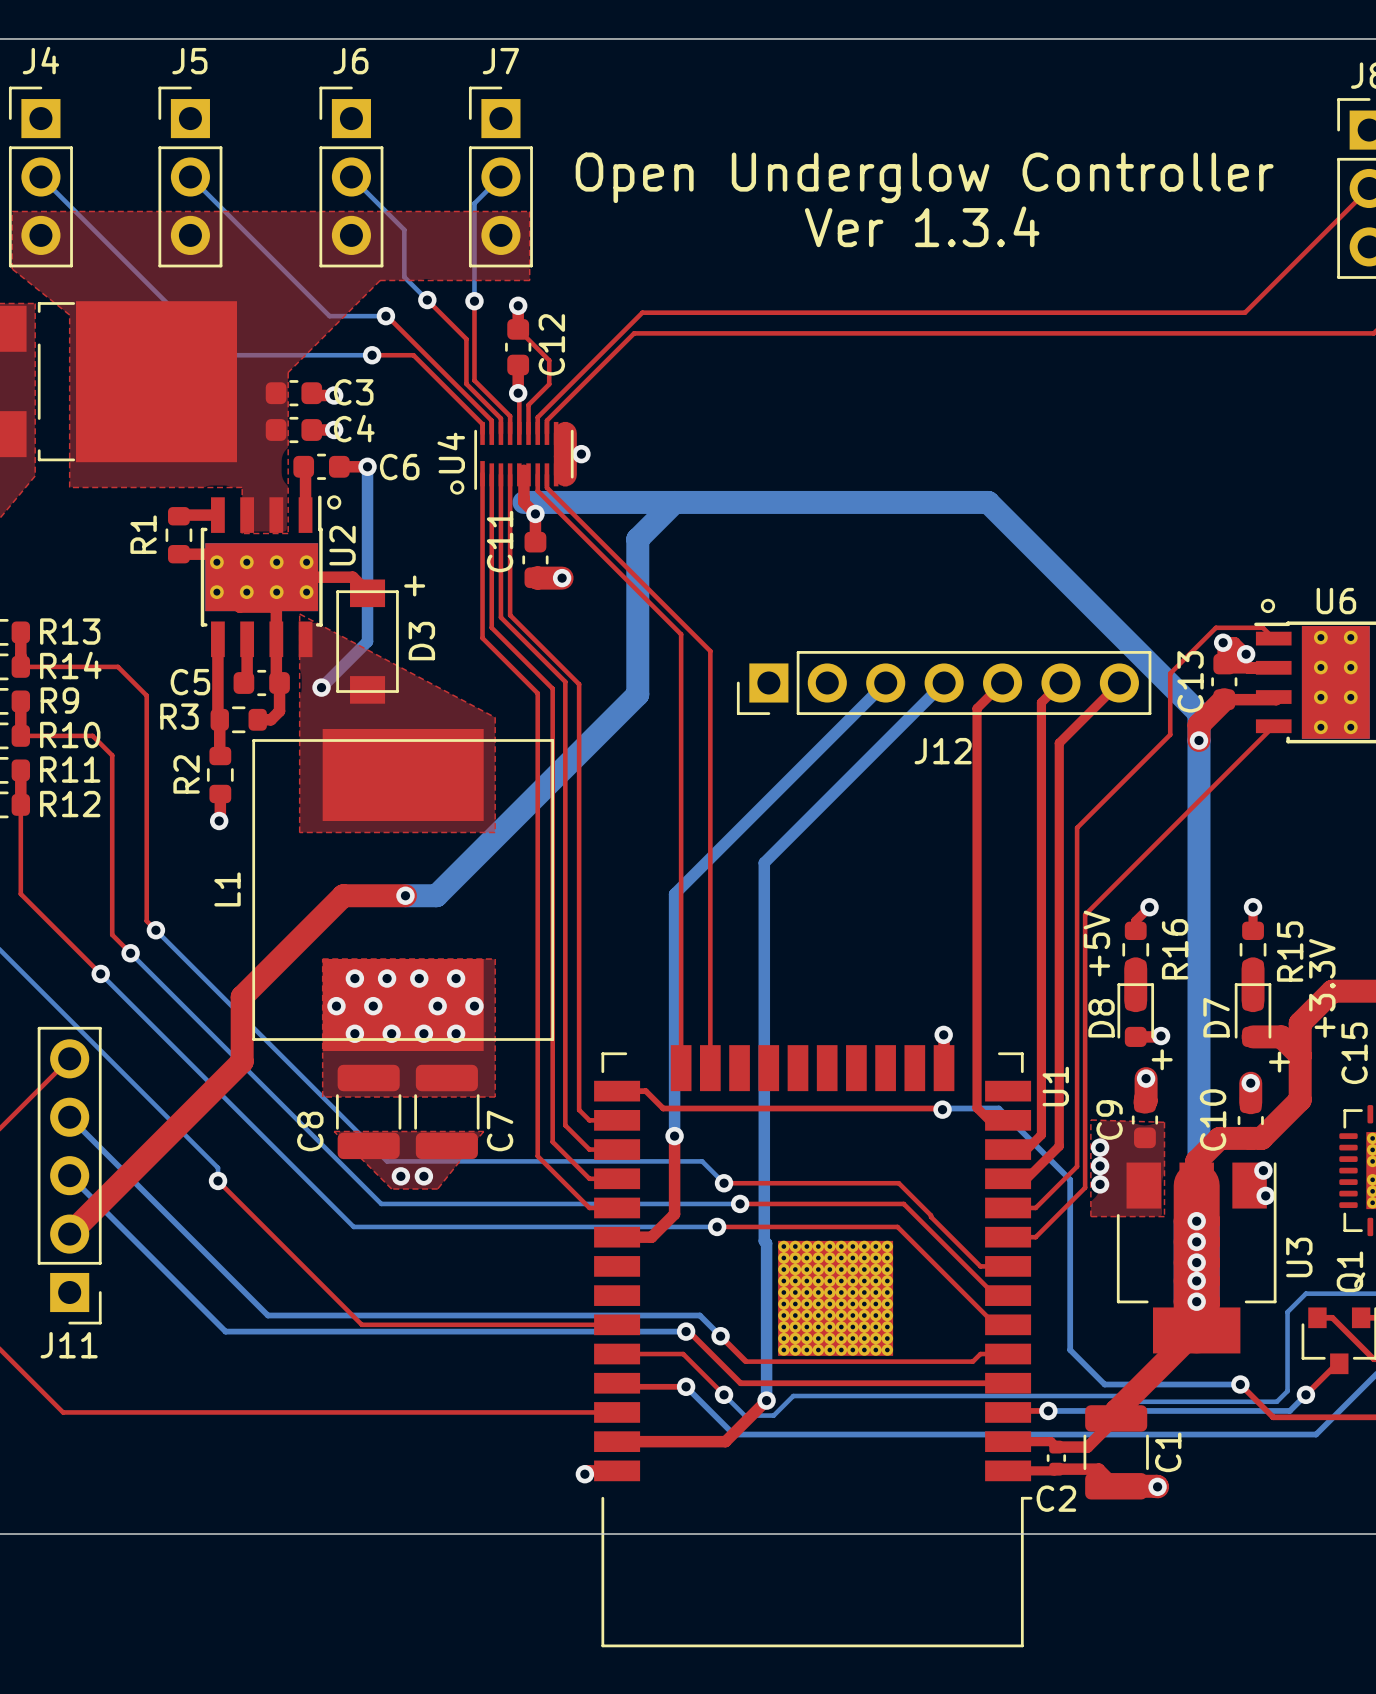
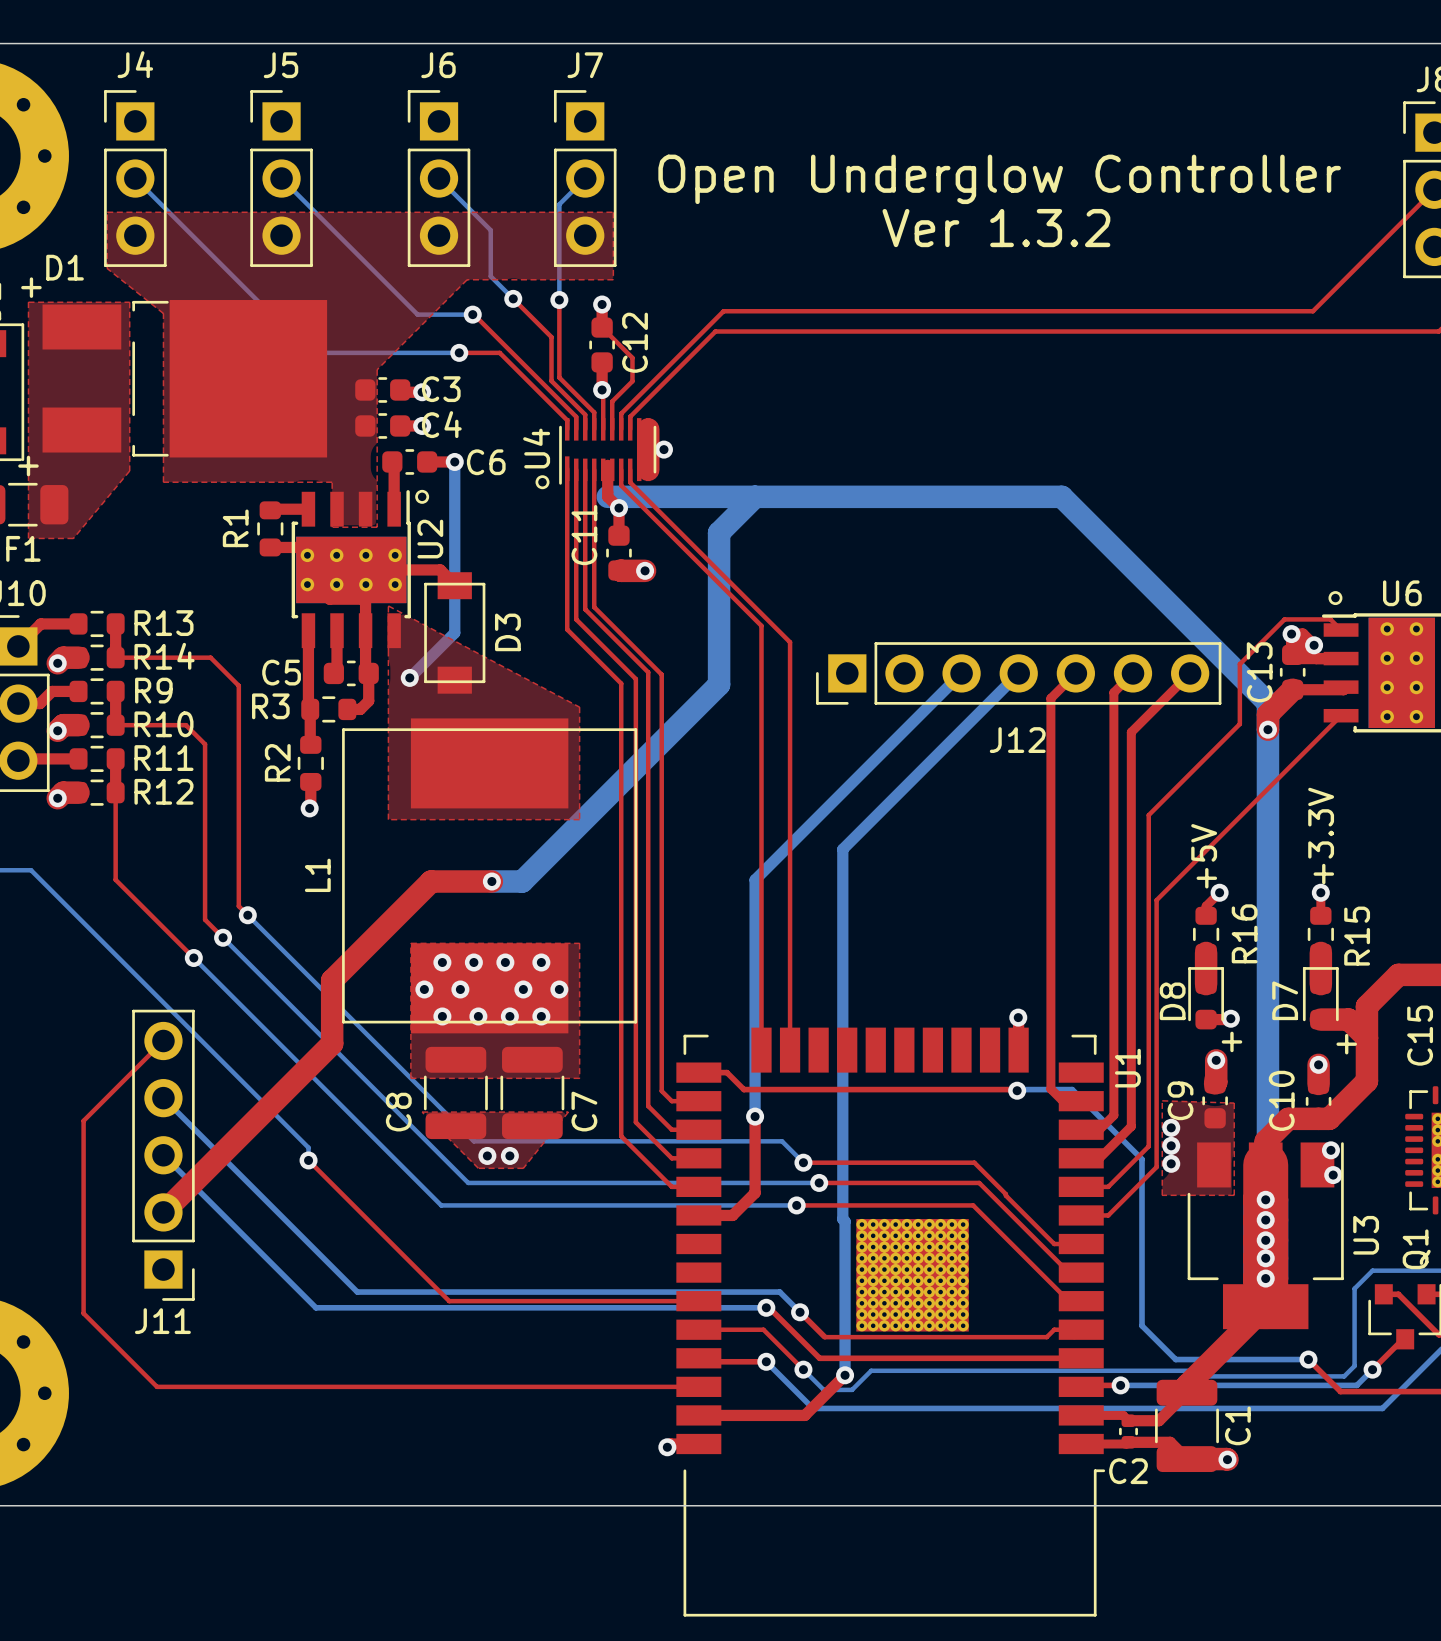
text: Ver 1.3.4 (922, 226) -> Ver 1.3.2 (996, 228)
text: + (414, 585) -> none
text position: +5V (1096, 943) -> +5V (1204, 856)
text position: +3.3V (1322, 988) -> +3.3V (1321, 836)

